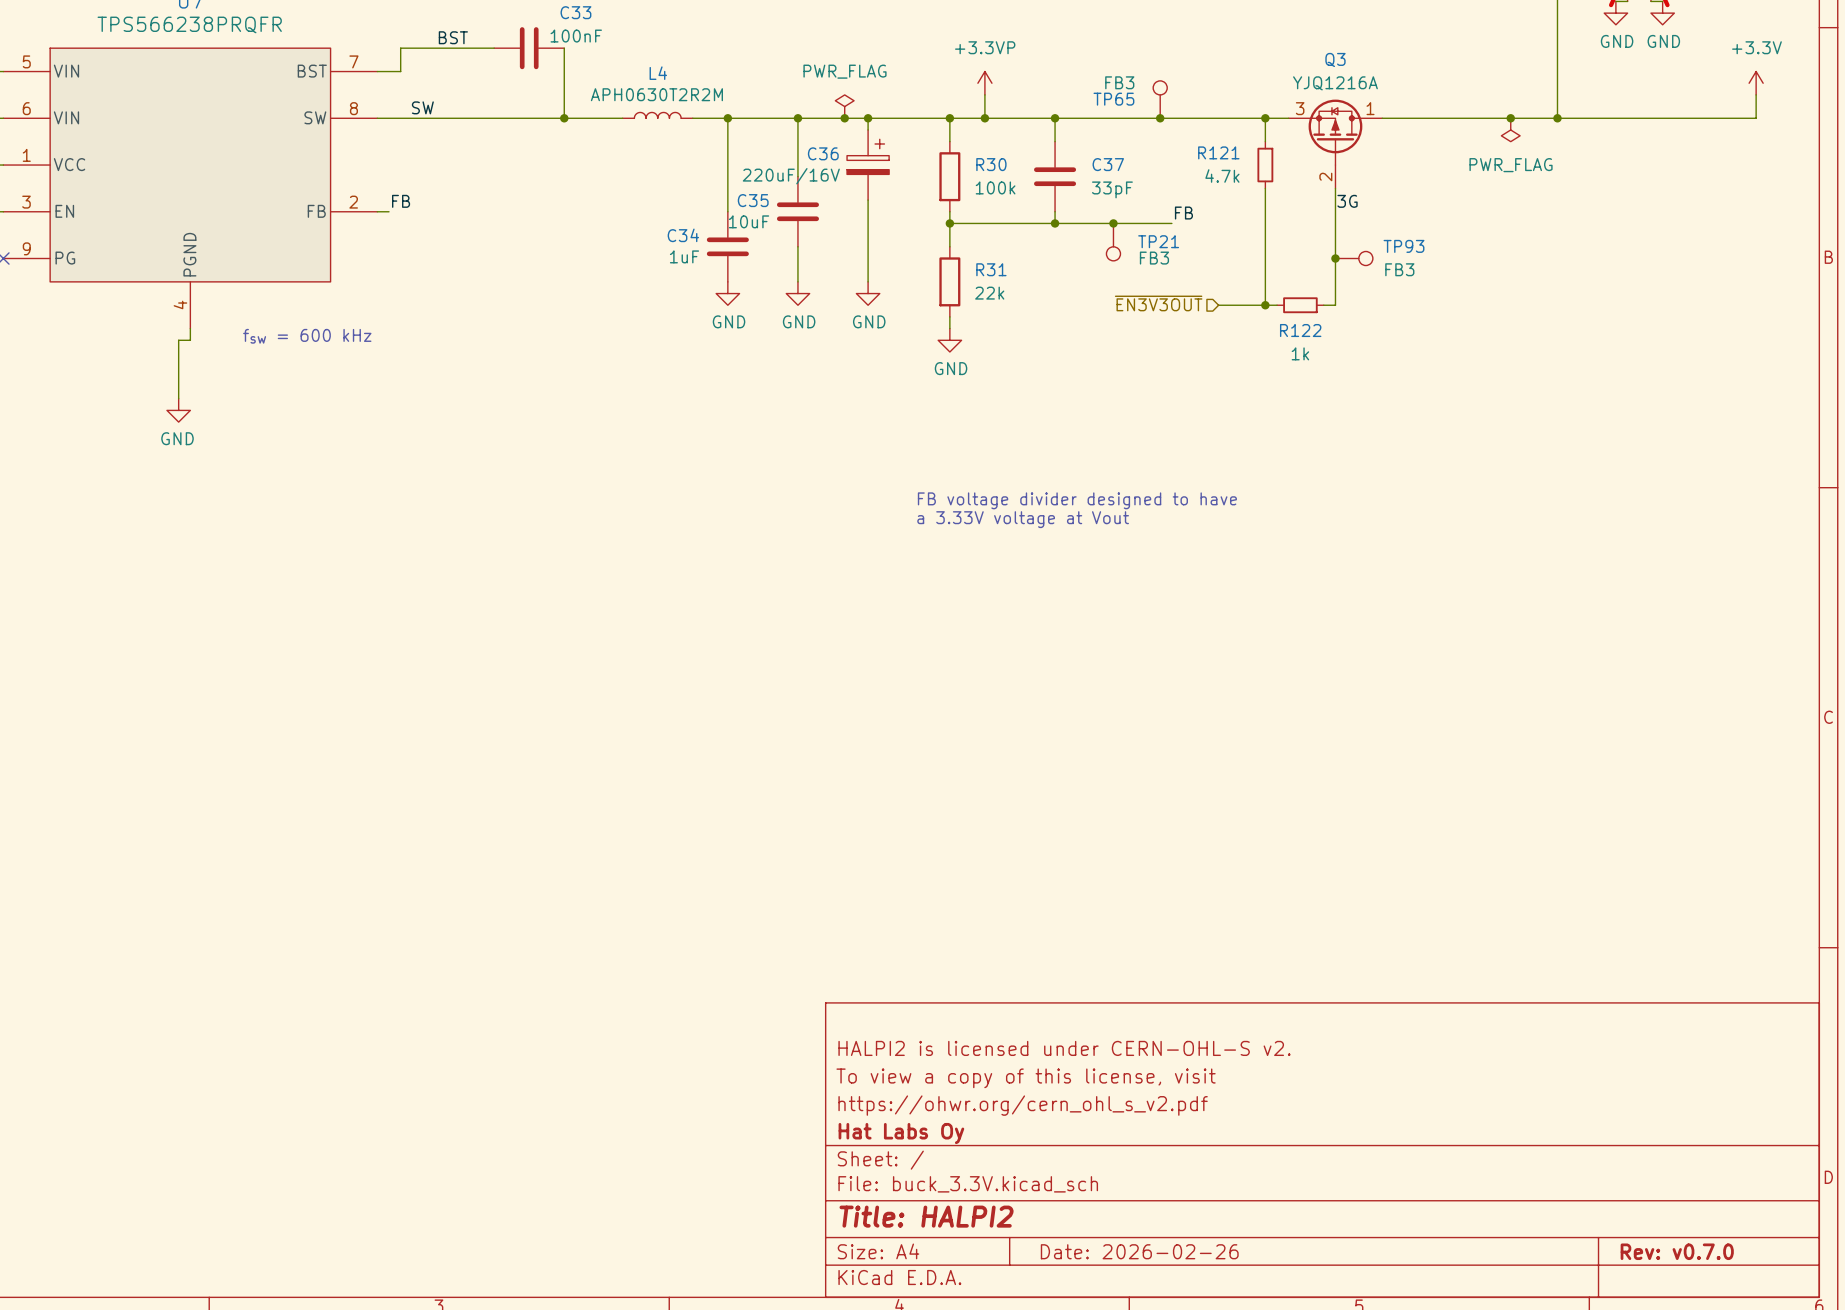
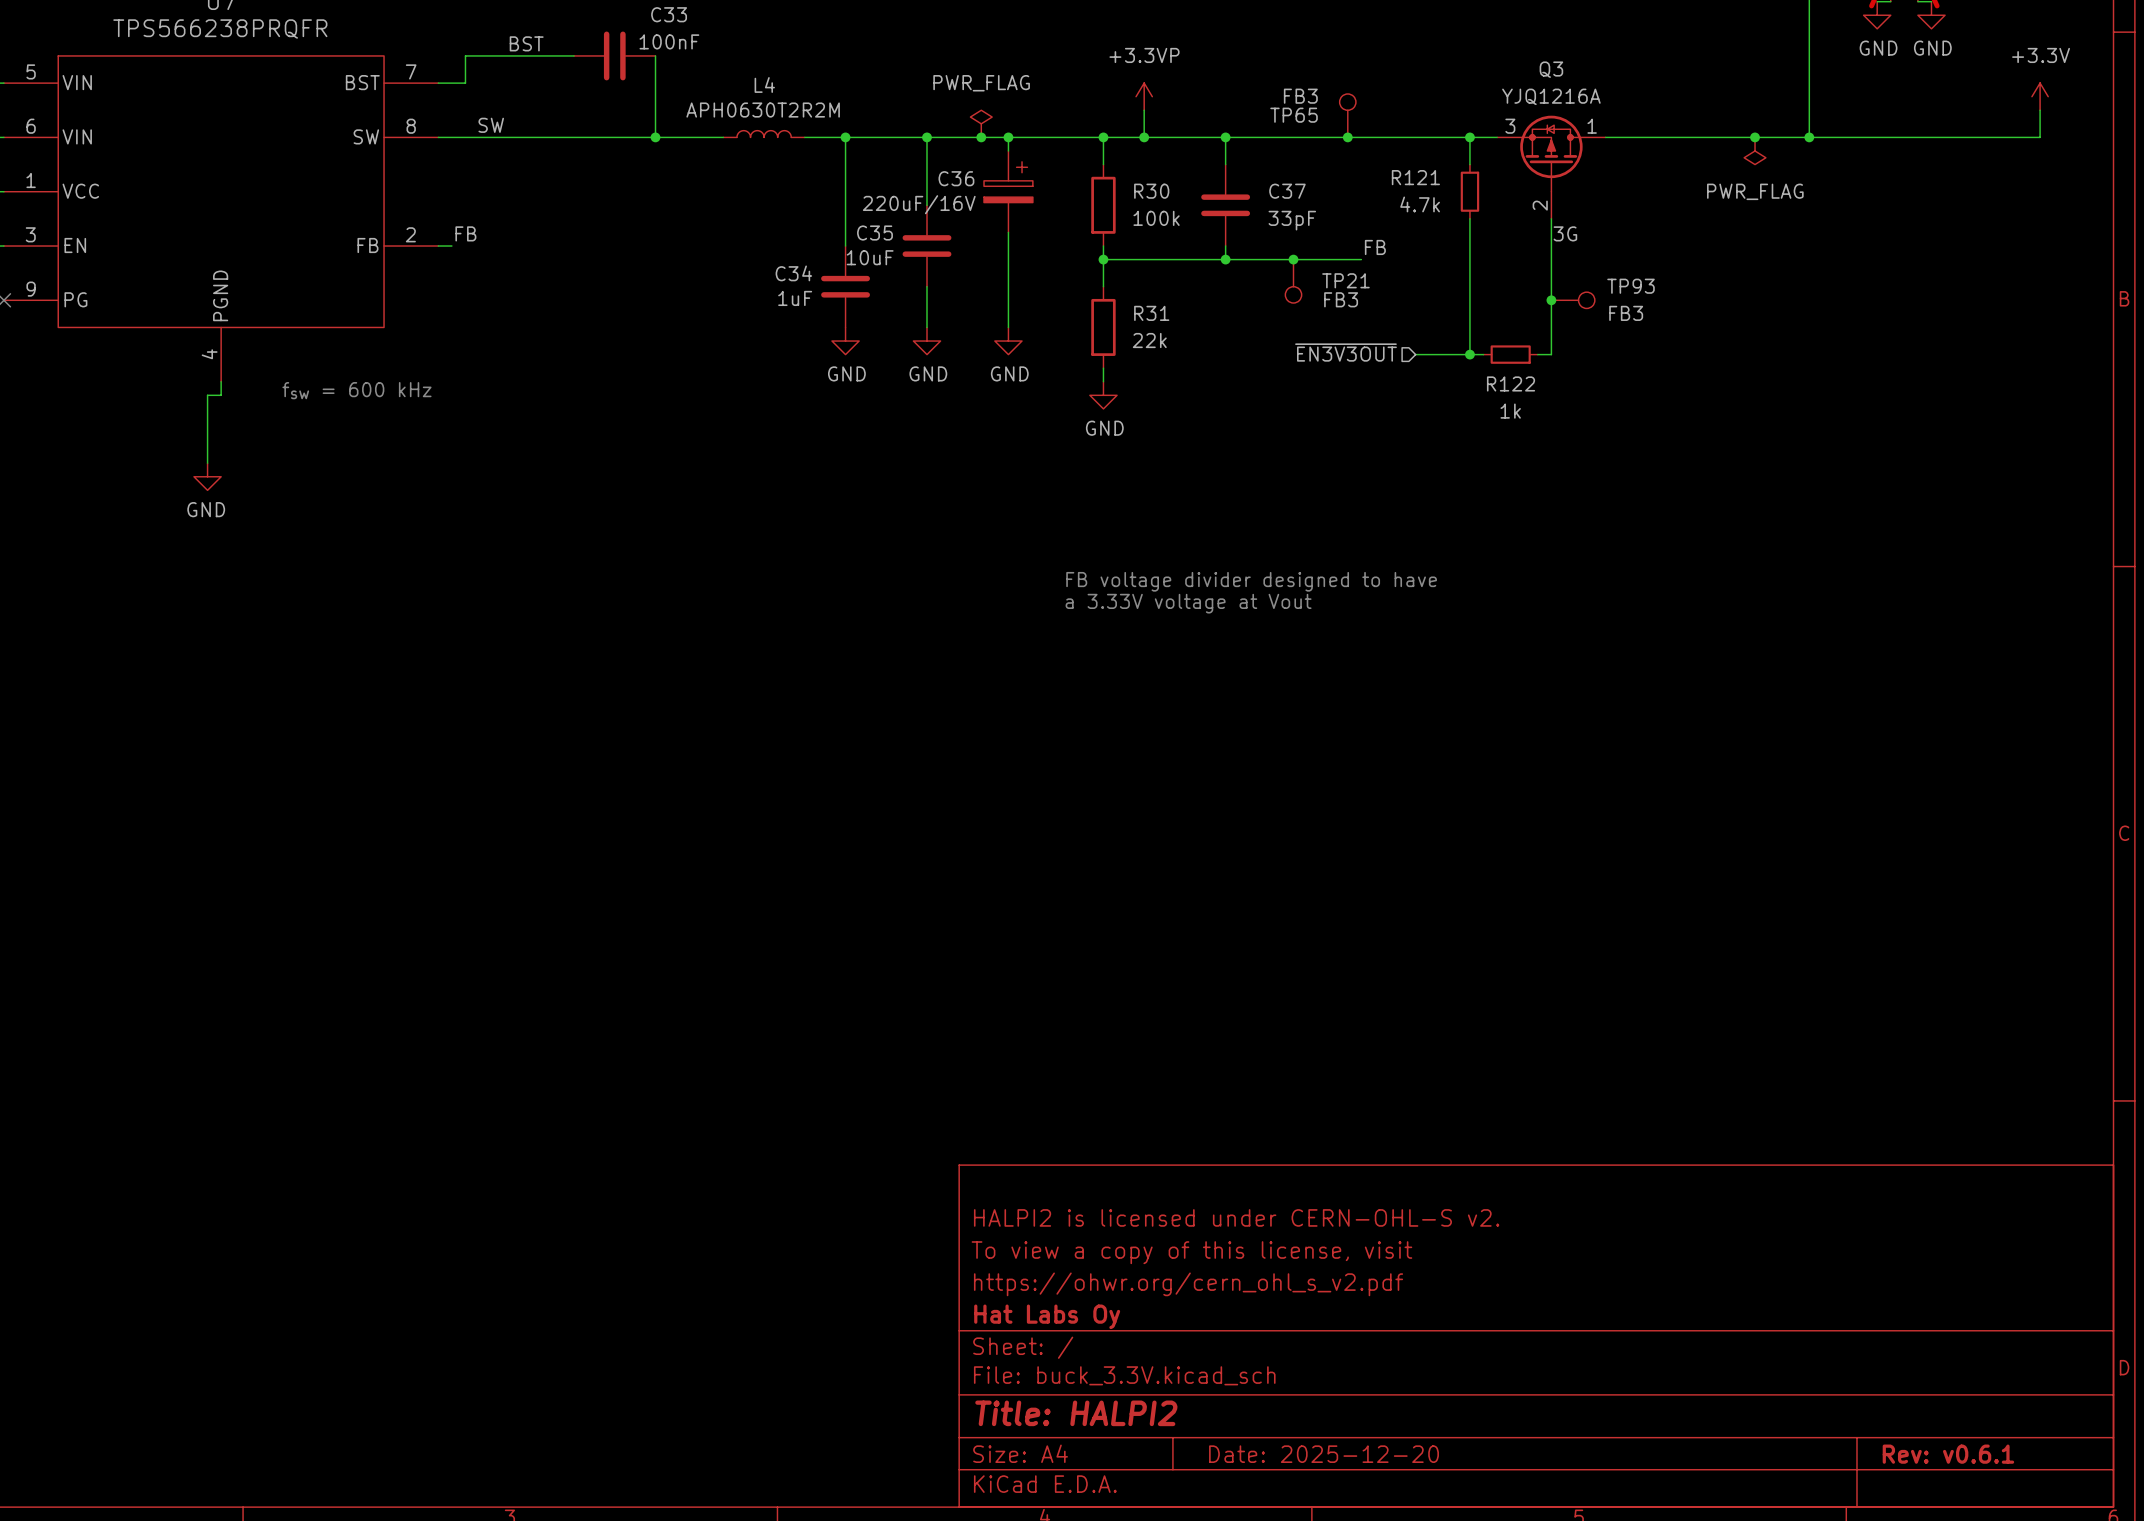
title block: Date: 2026-02-26 (1139, 1251) -> Date: 2025-12-20 (1324, 1454)
title block: Rev: v0.7.0 (1677, 1251) -> Rev: v0.6.1 (1948, 1454)

